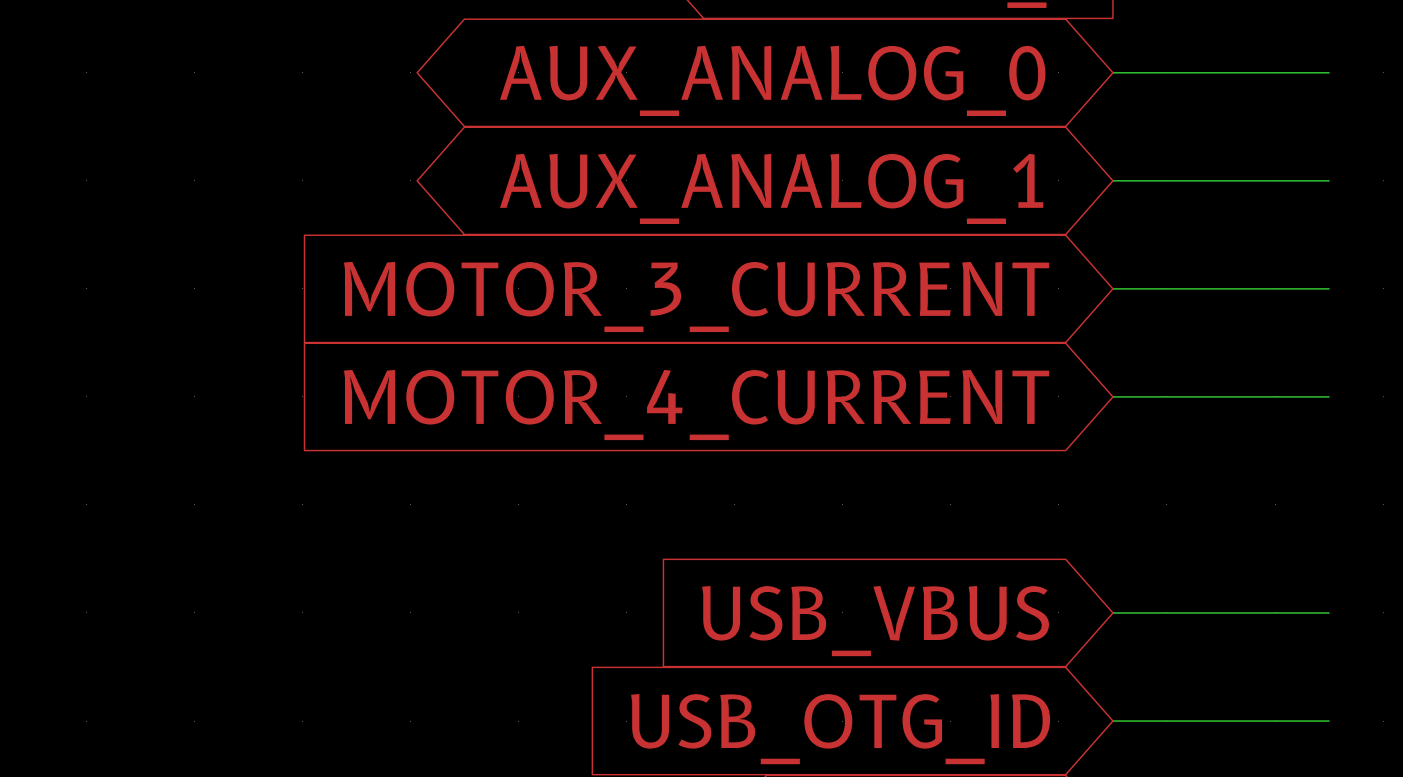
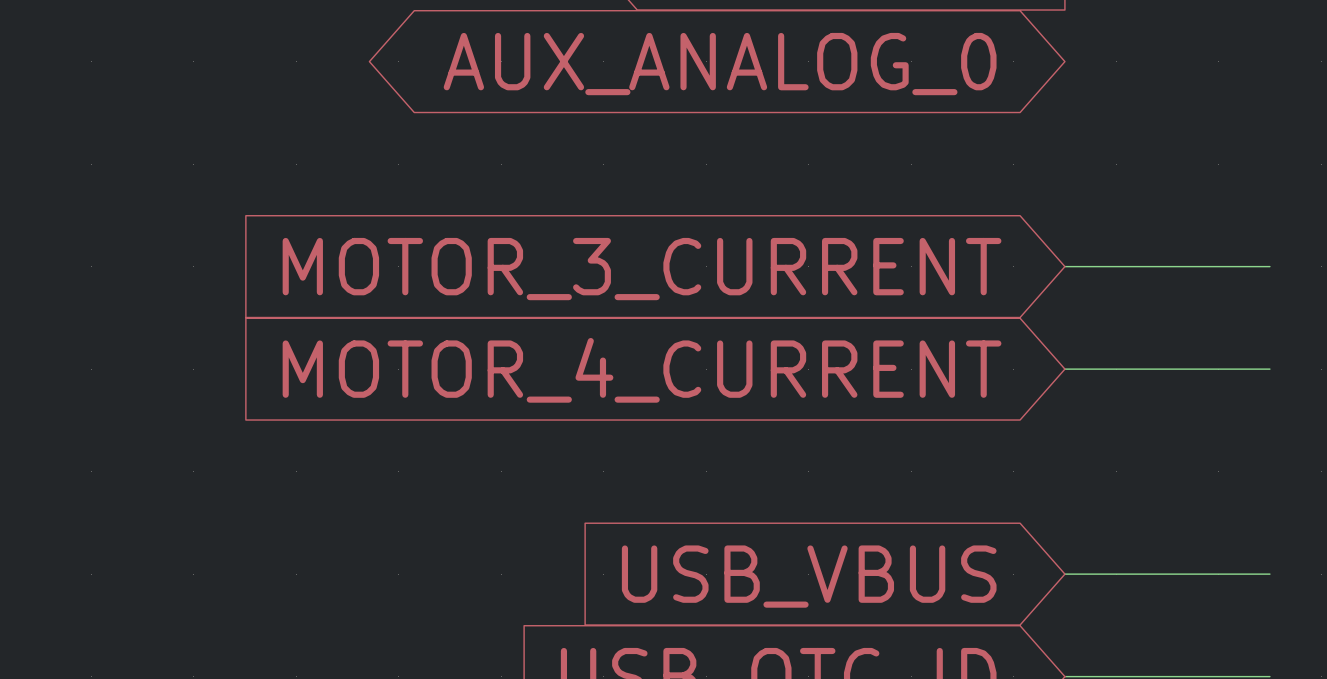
wire: (1112, 72) (1329, 72) -> none
wire: (1112, 180) (1329, 180) -> none
global label: AUX_ANALOG_1 (771, 188) -> none

